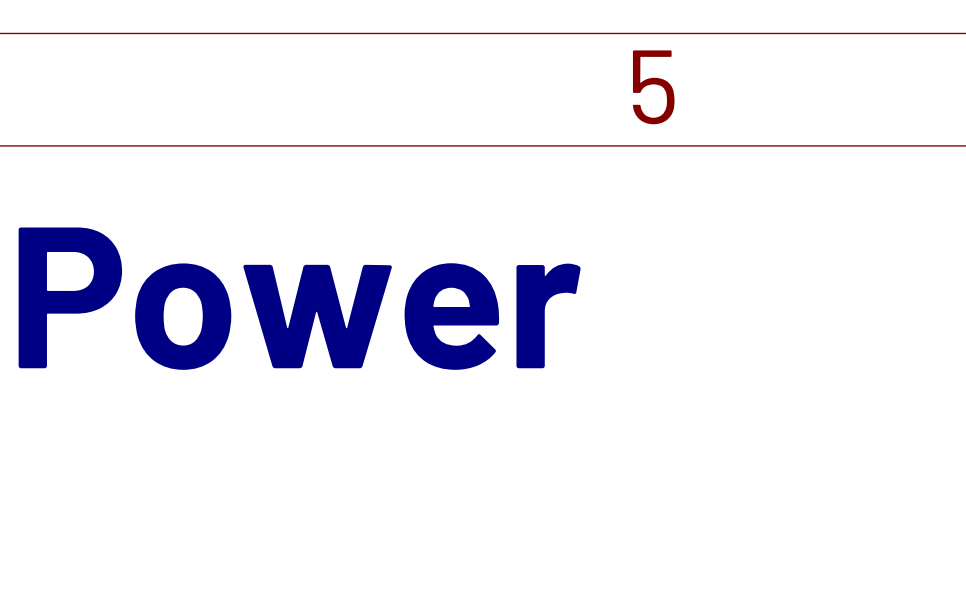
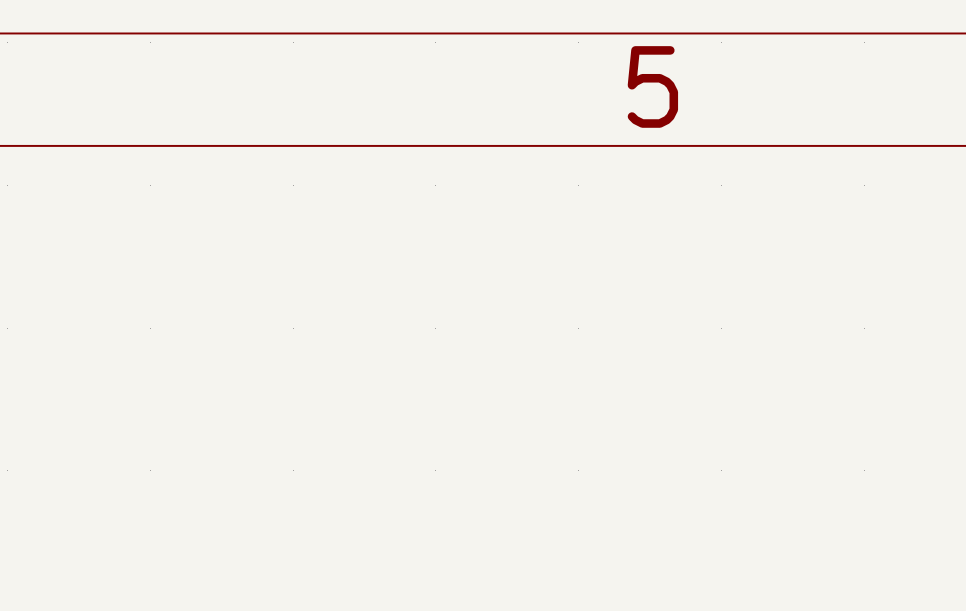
text: Power (299, 298) -> none

